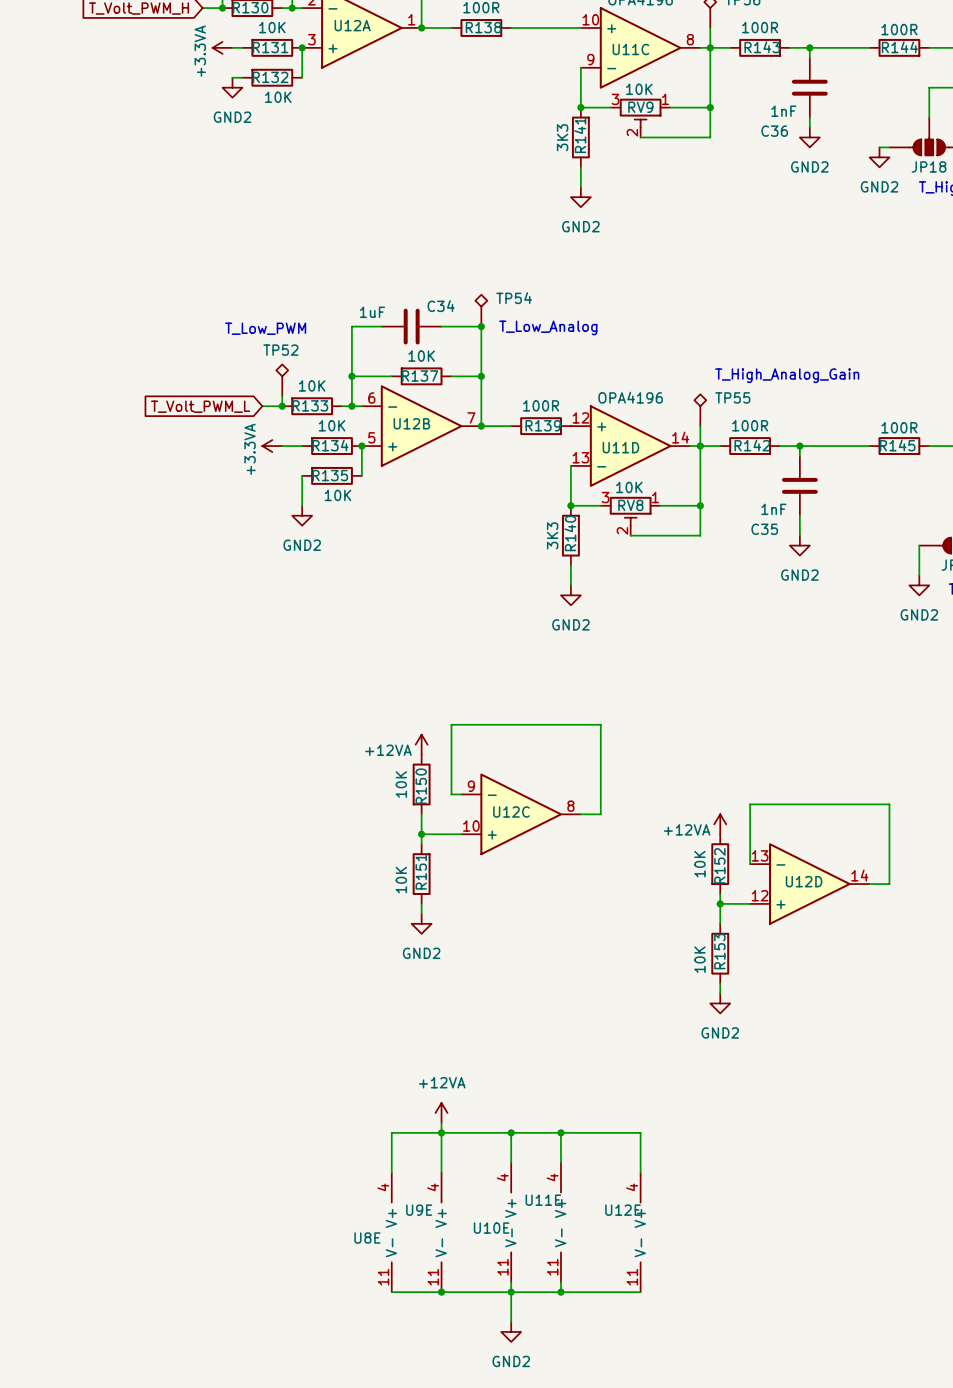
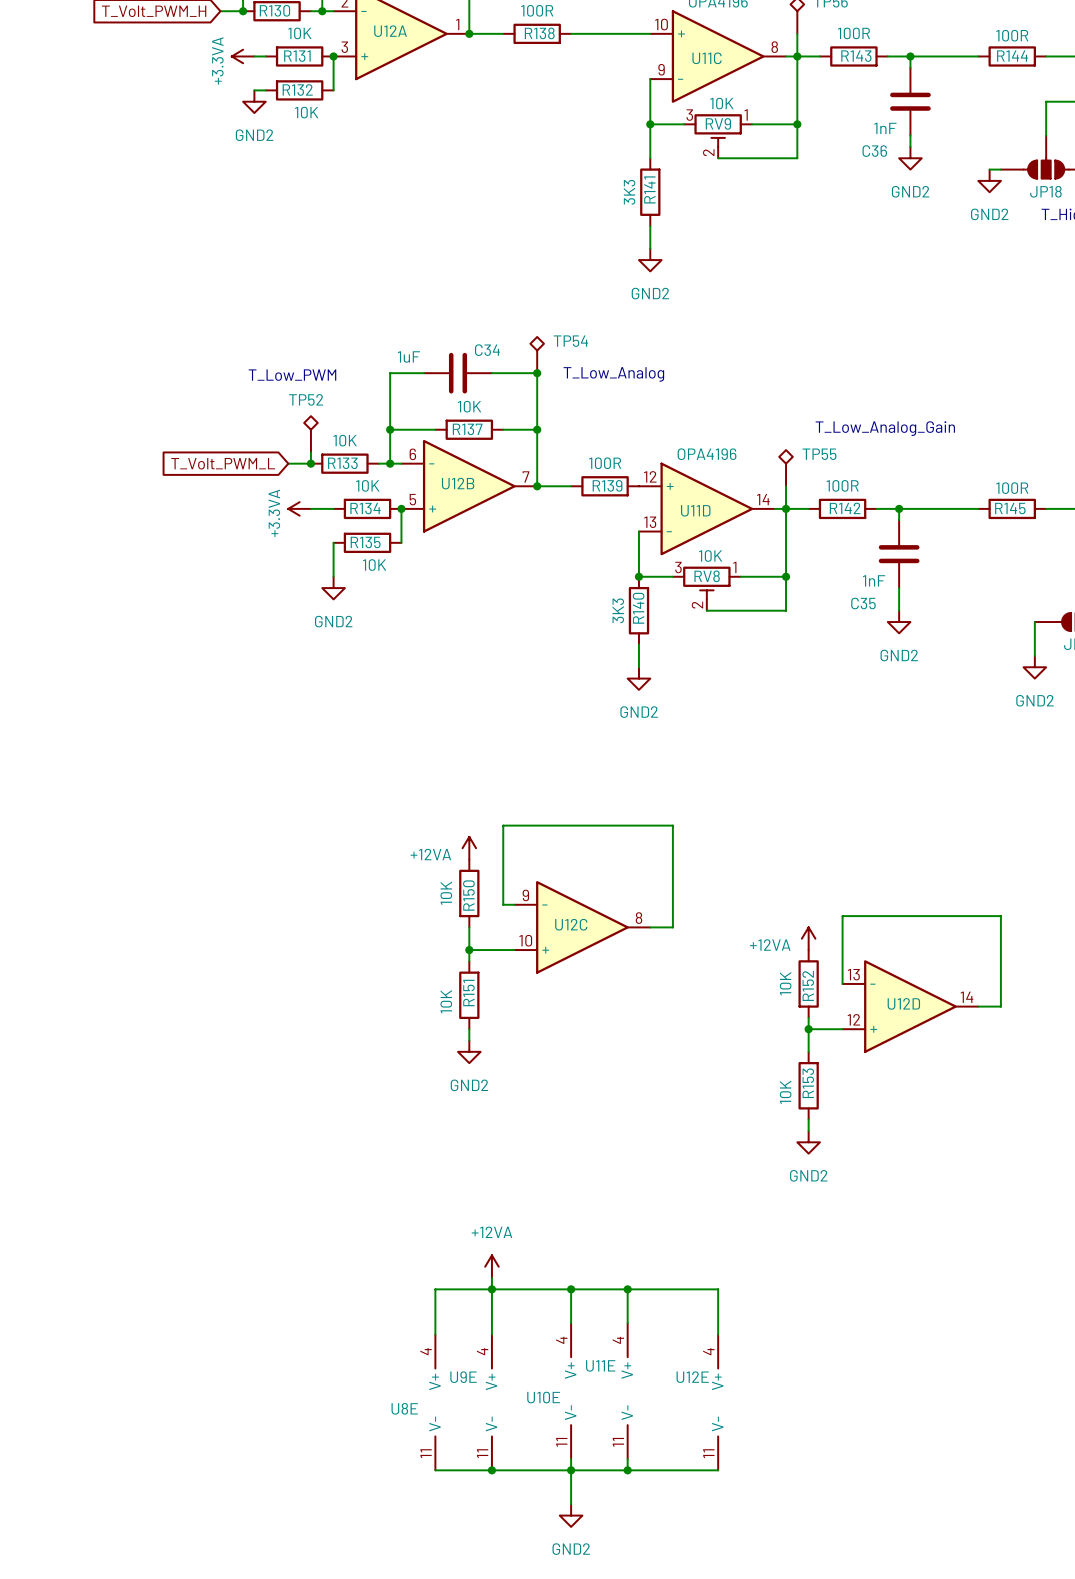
wire: none -> (650, 124) (650, 158)
R141 position: (580, 137) -> (650, 192)
wire: (580, 167) (580, 187) -> (650, 226) (650, 248)
power symbol position: GND2 (580, 197) -> GND2 (650, 260)
text: T_High_Analog_Gain (787, 375) -> T_Low_Analog_Gain (885, 428)

